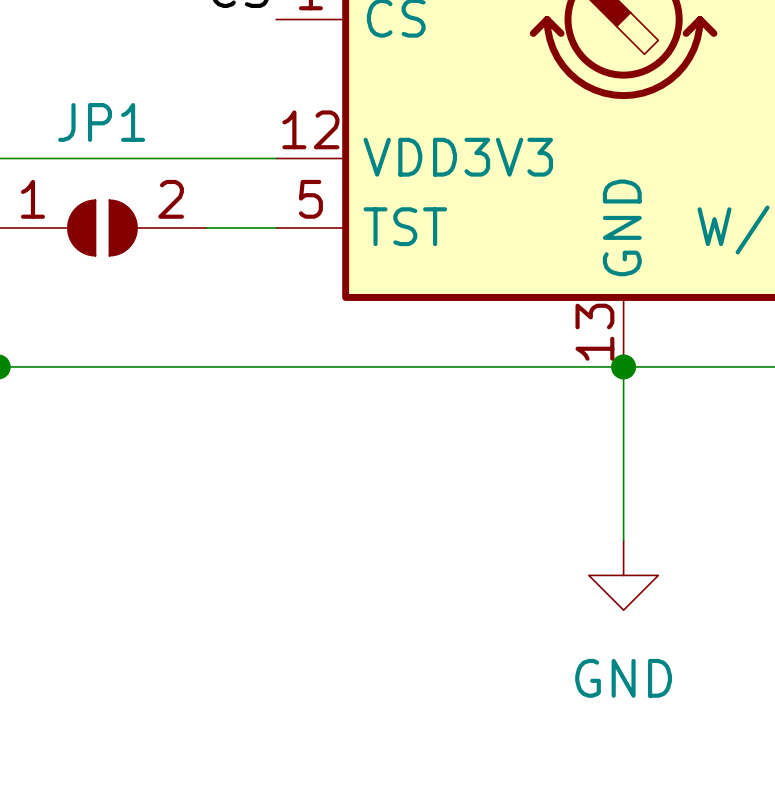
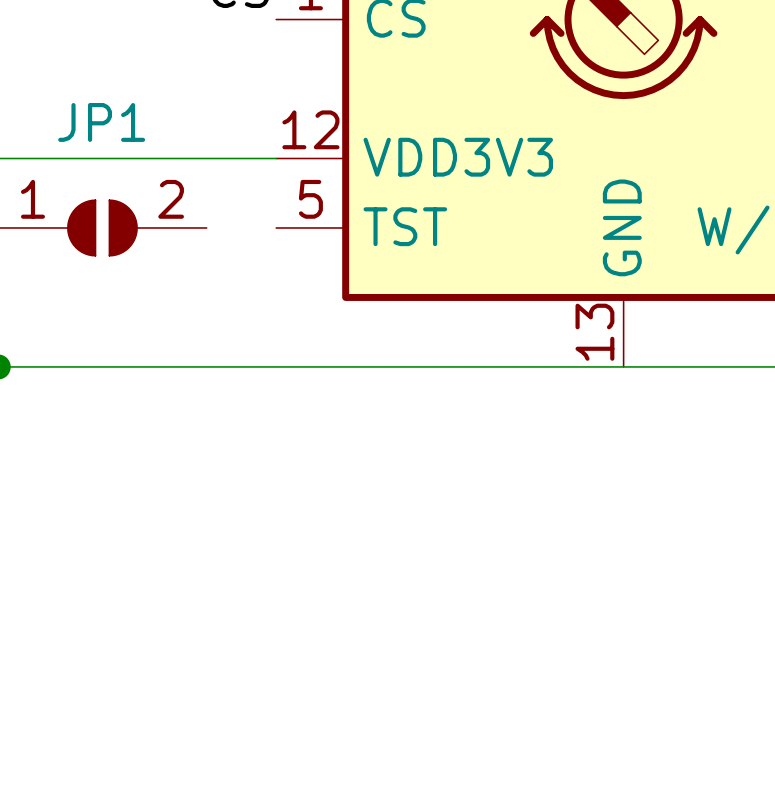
wire: (206, 227) (276, 227) -> none
wire: (623, 366) (623, 540) -> none
junction: (623, 366) -> none
power symbol: GND (623, 575) -> none

